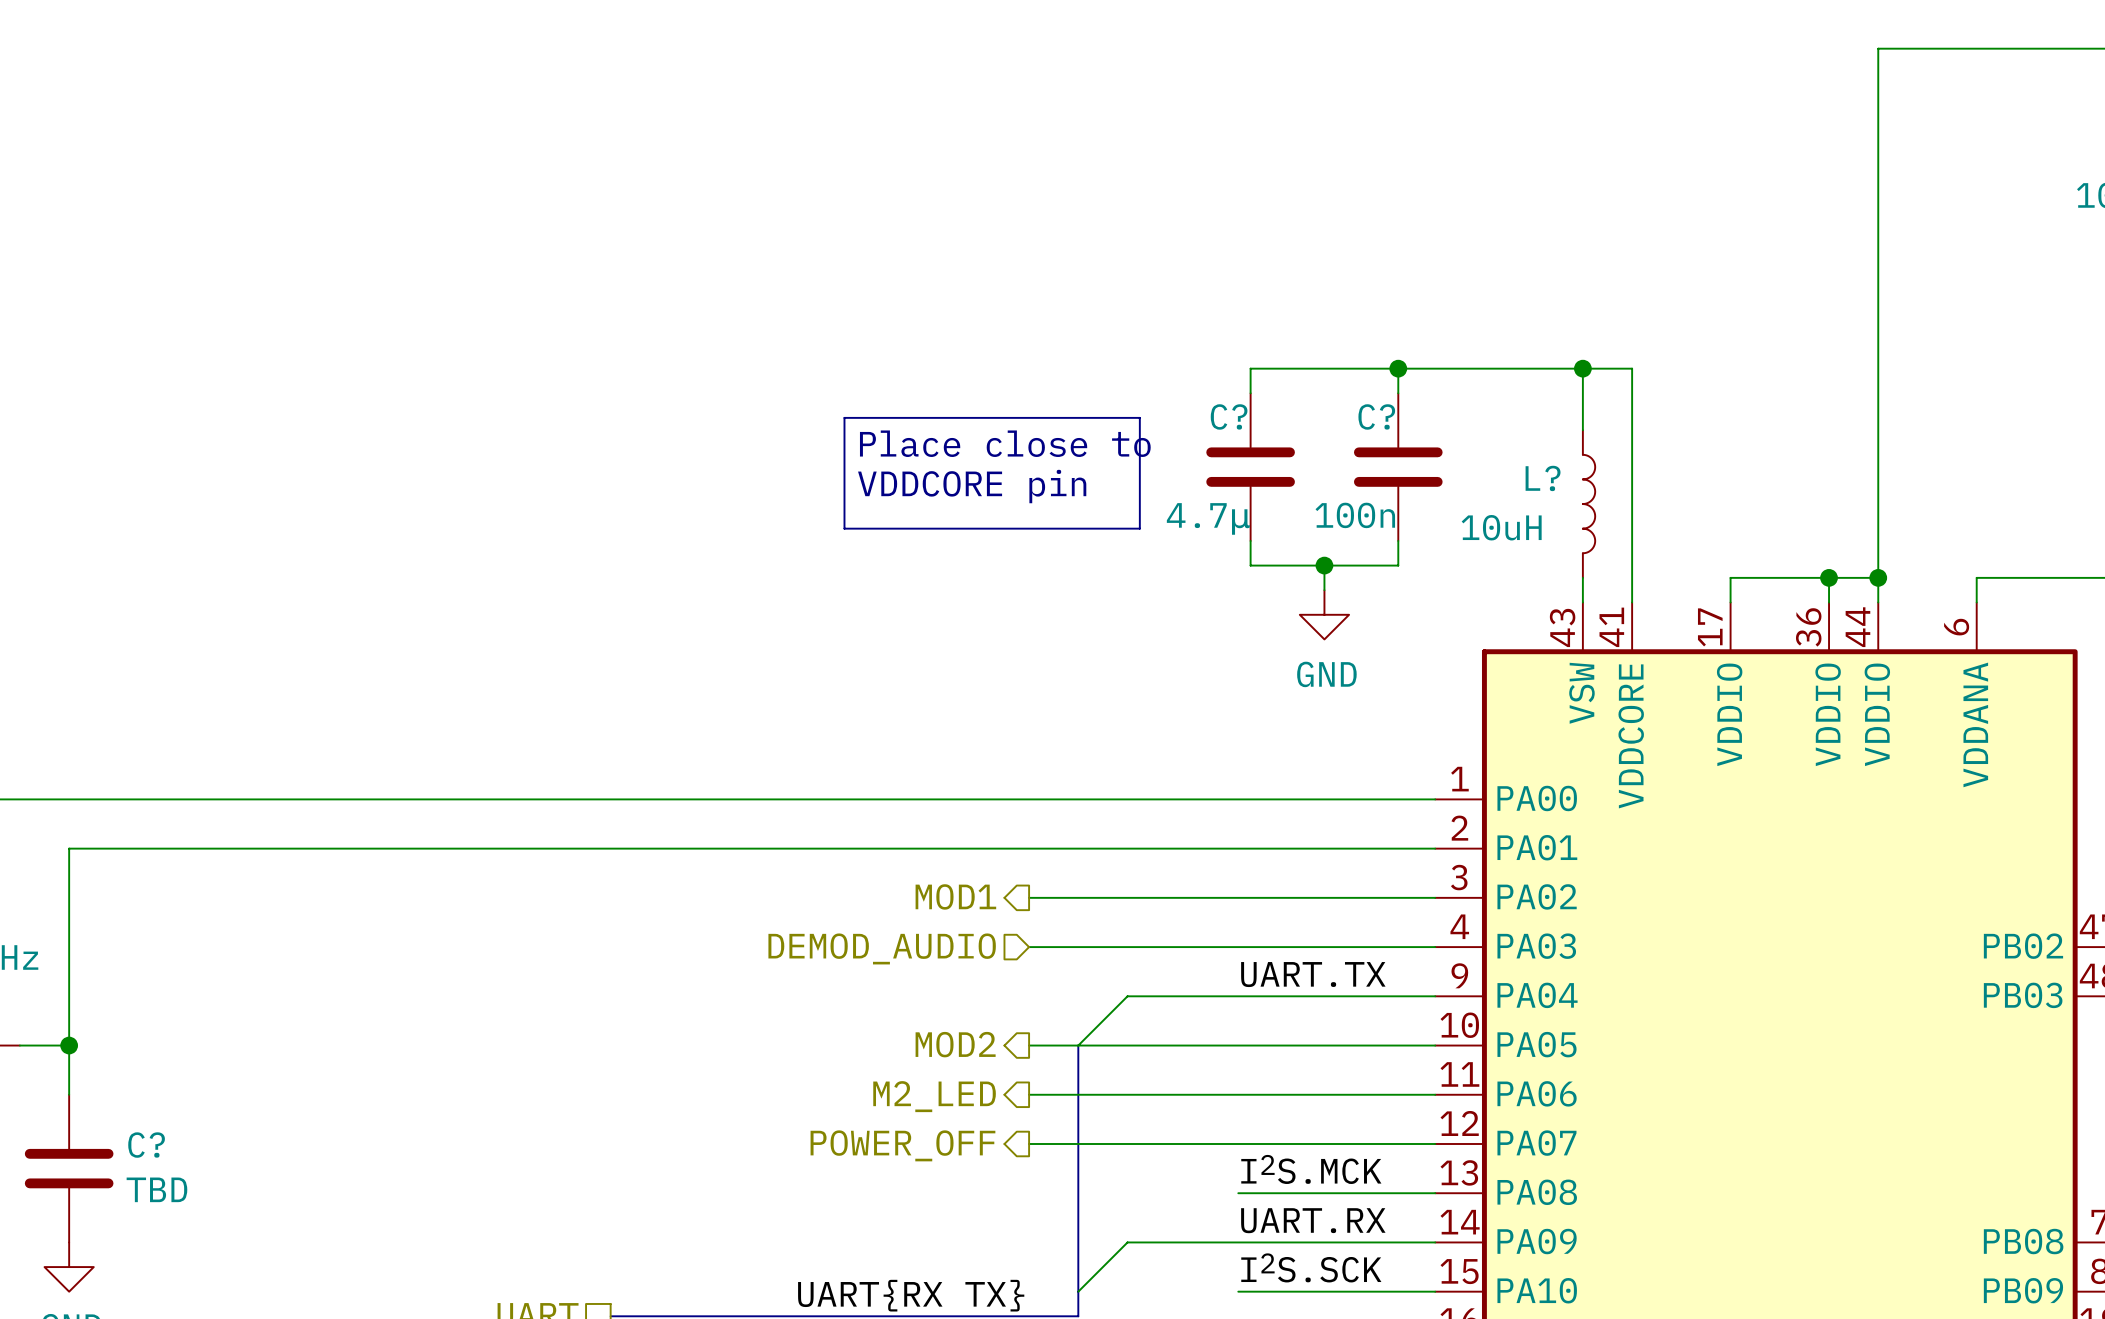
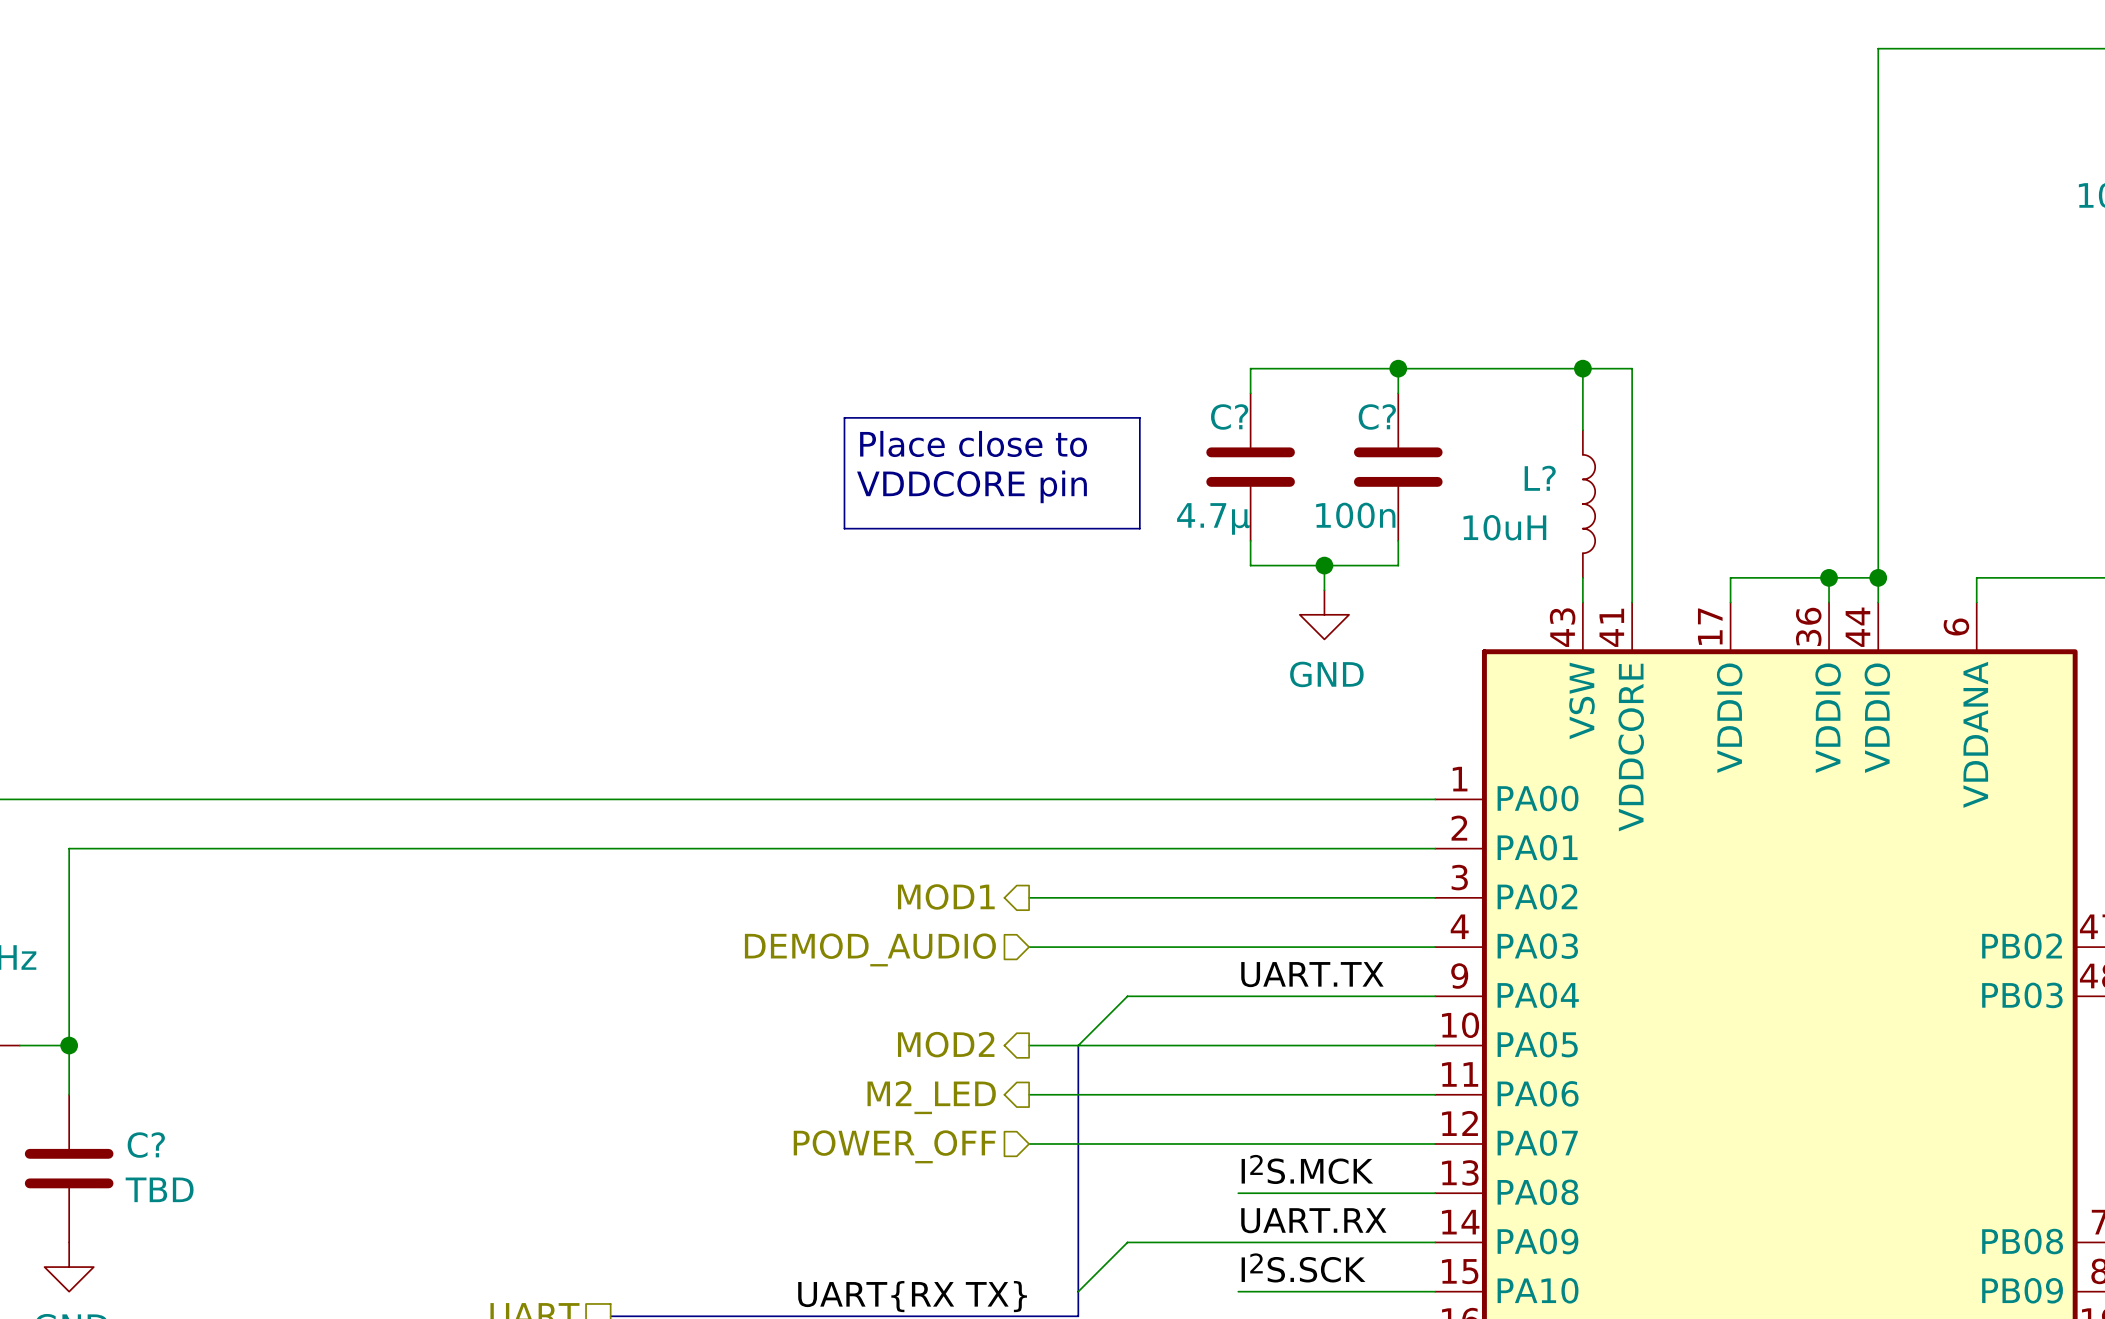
hierarchical label shape: output (902, 1145) -> input (894, 1146)

